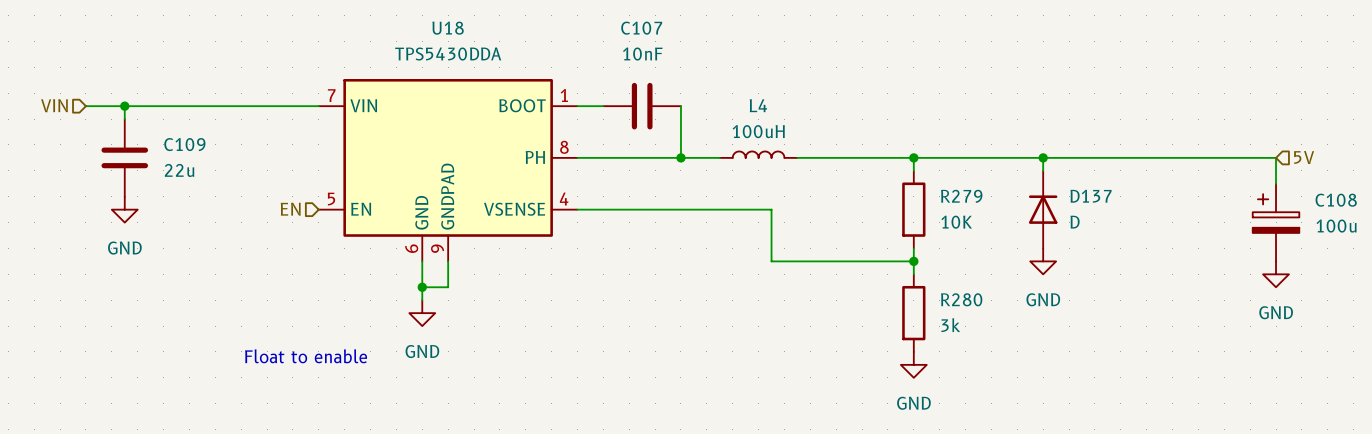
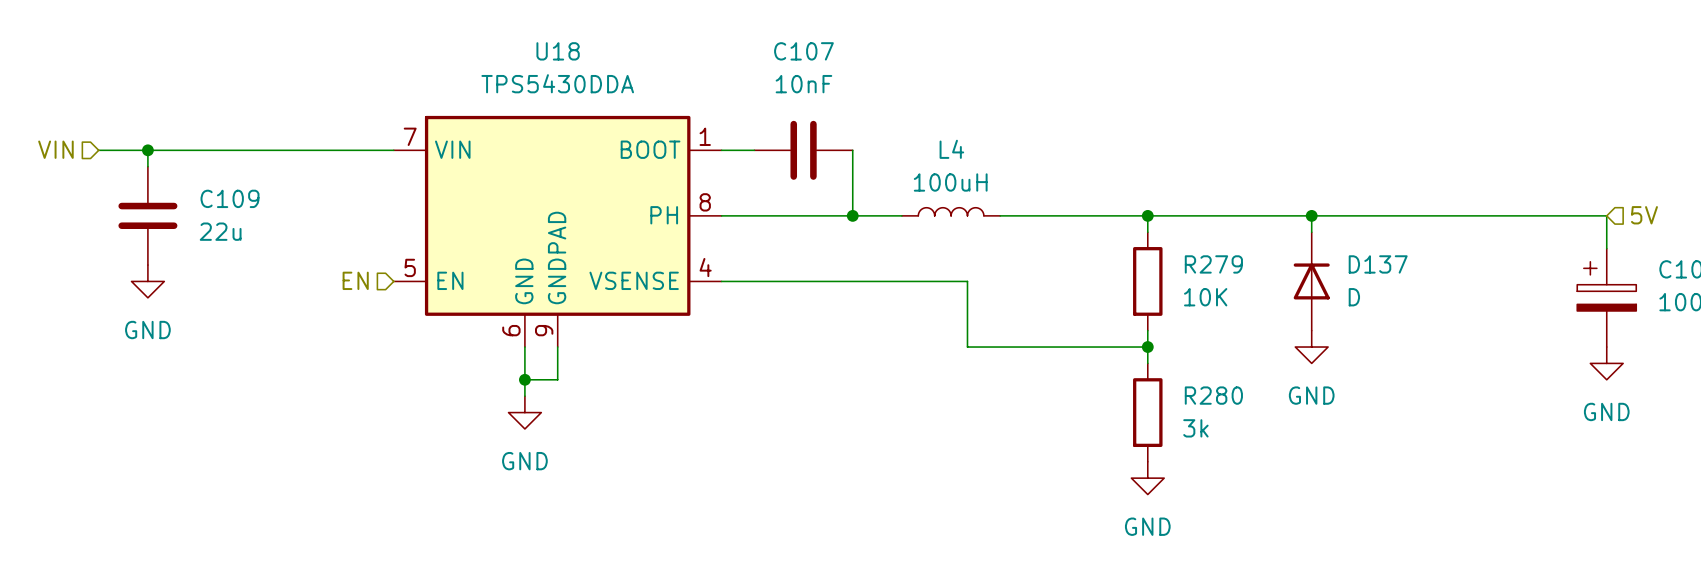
text: Float to enable (306, 356) -> none

